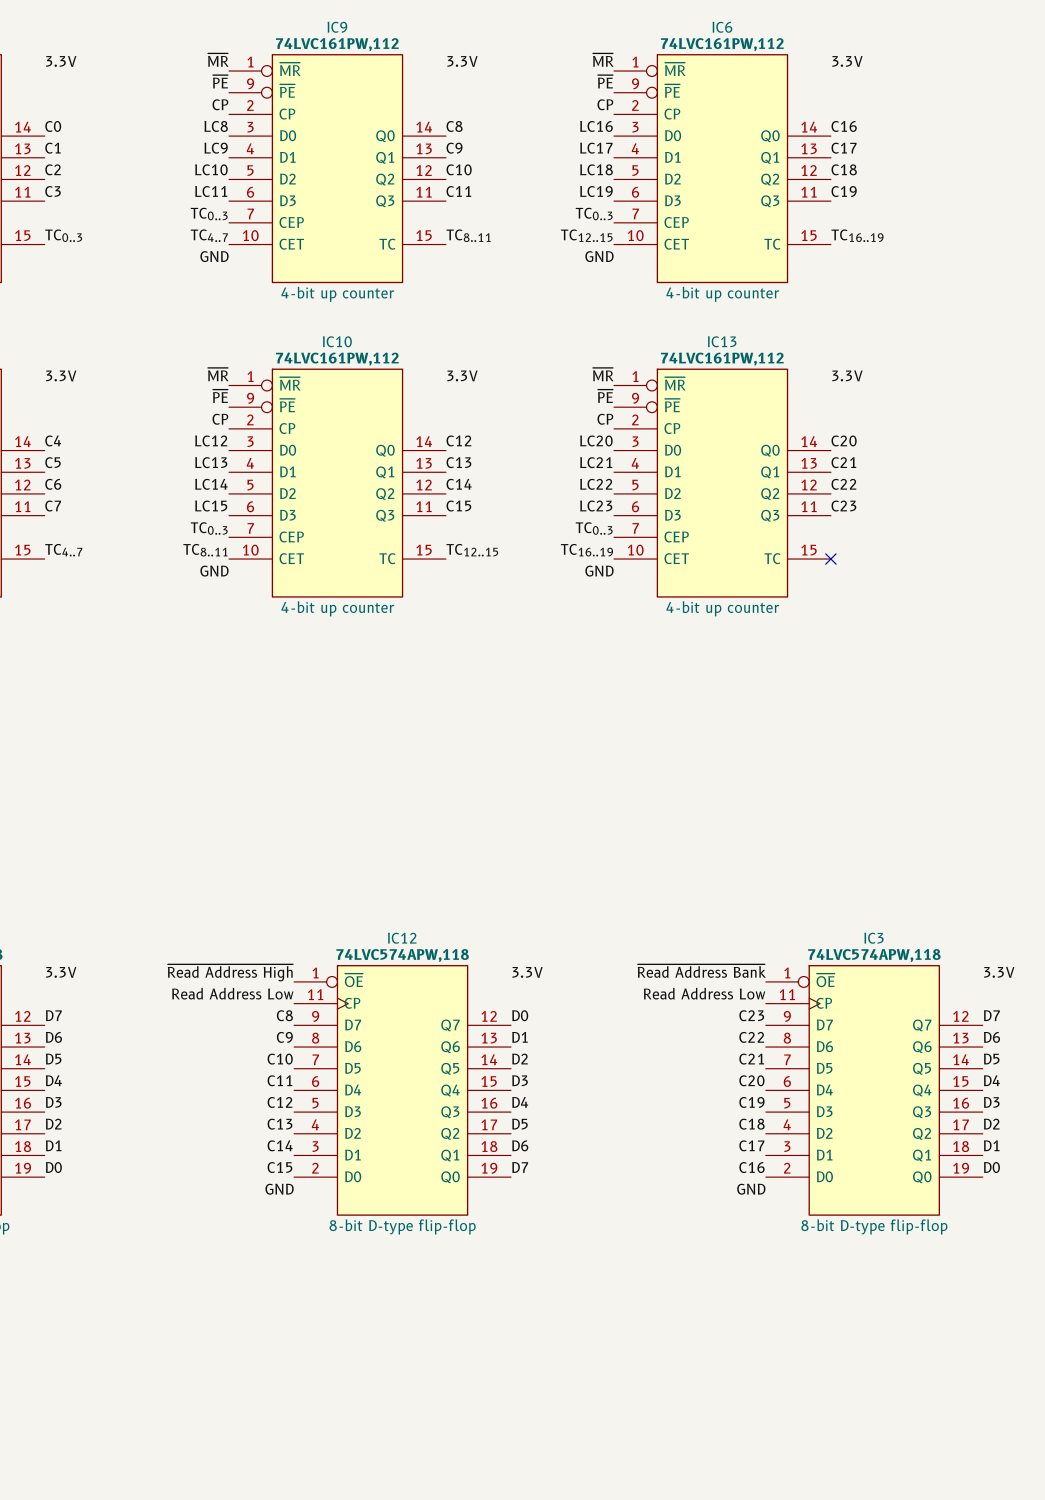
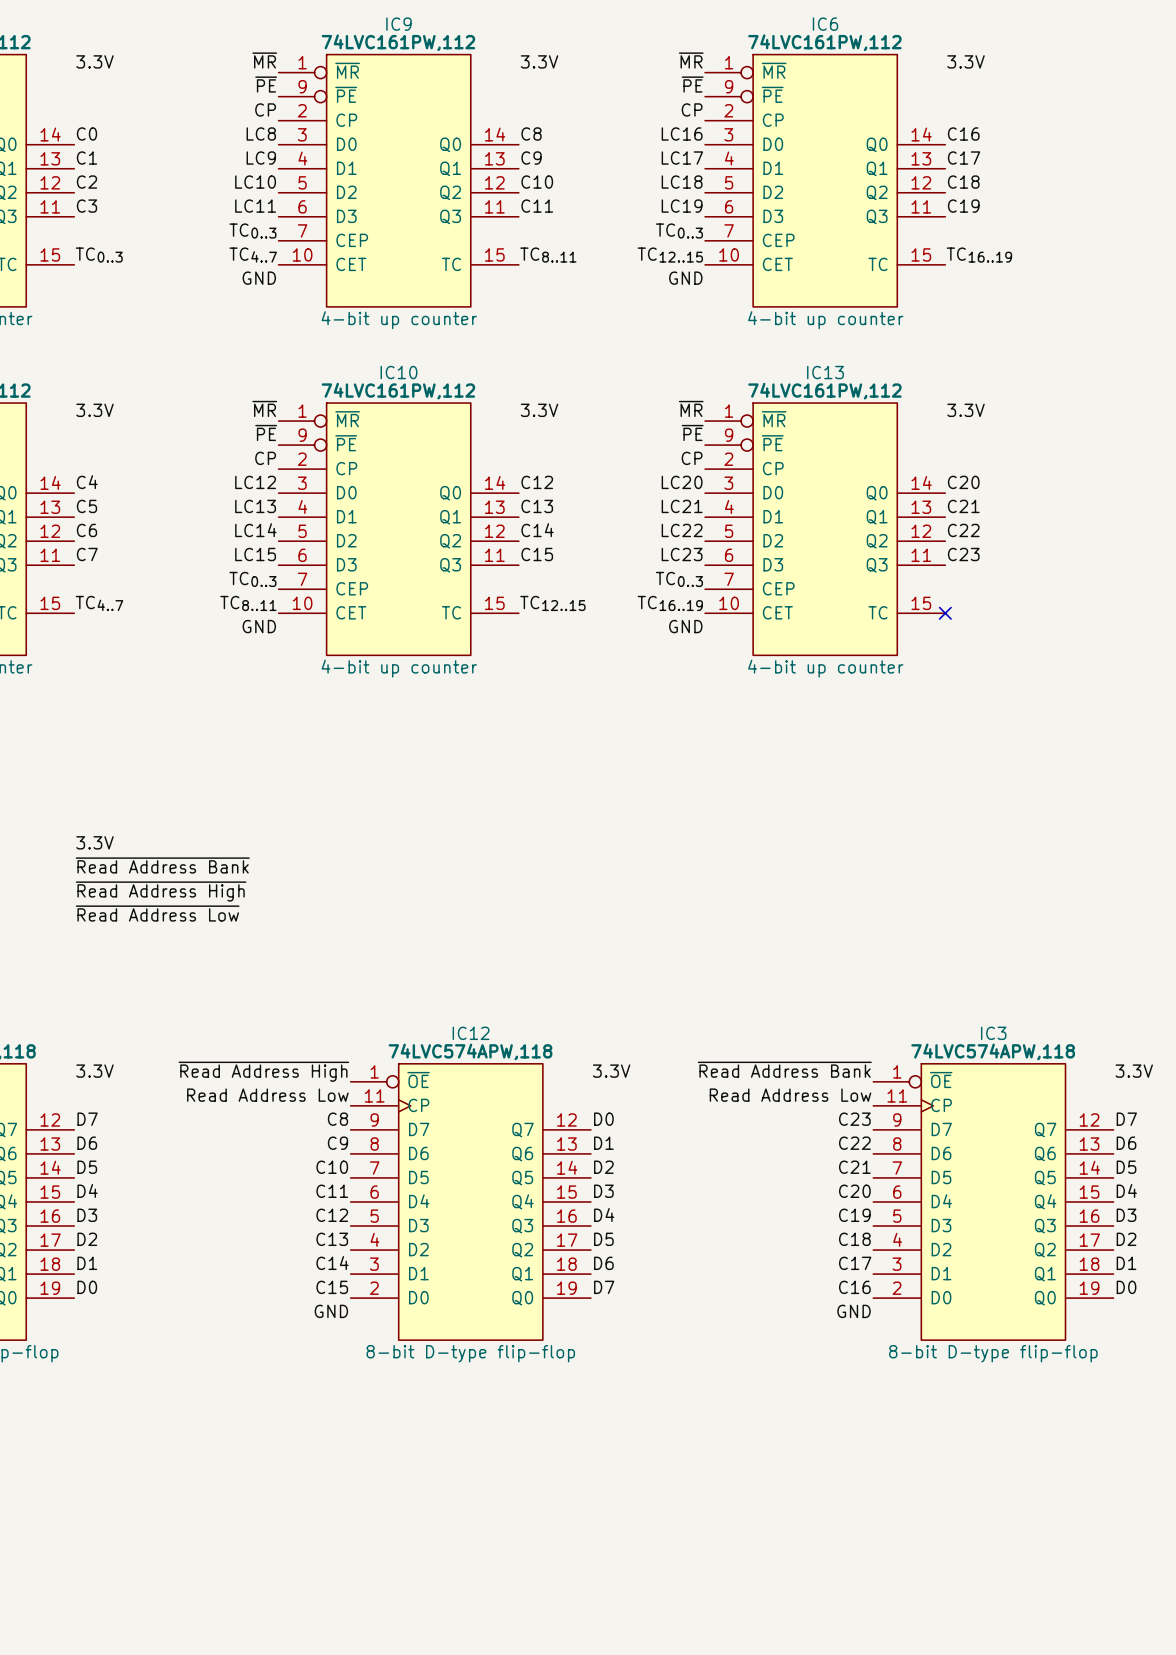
label: none -> 3.3V (94, 842)
label: none -> ~{Read Address Bank} (162, 865)
label: none -> ~{Read Address High} (161, 891)
label: none -> ~{Read Address Low} (157, 913)

